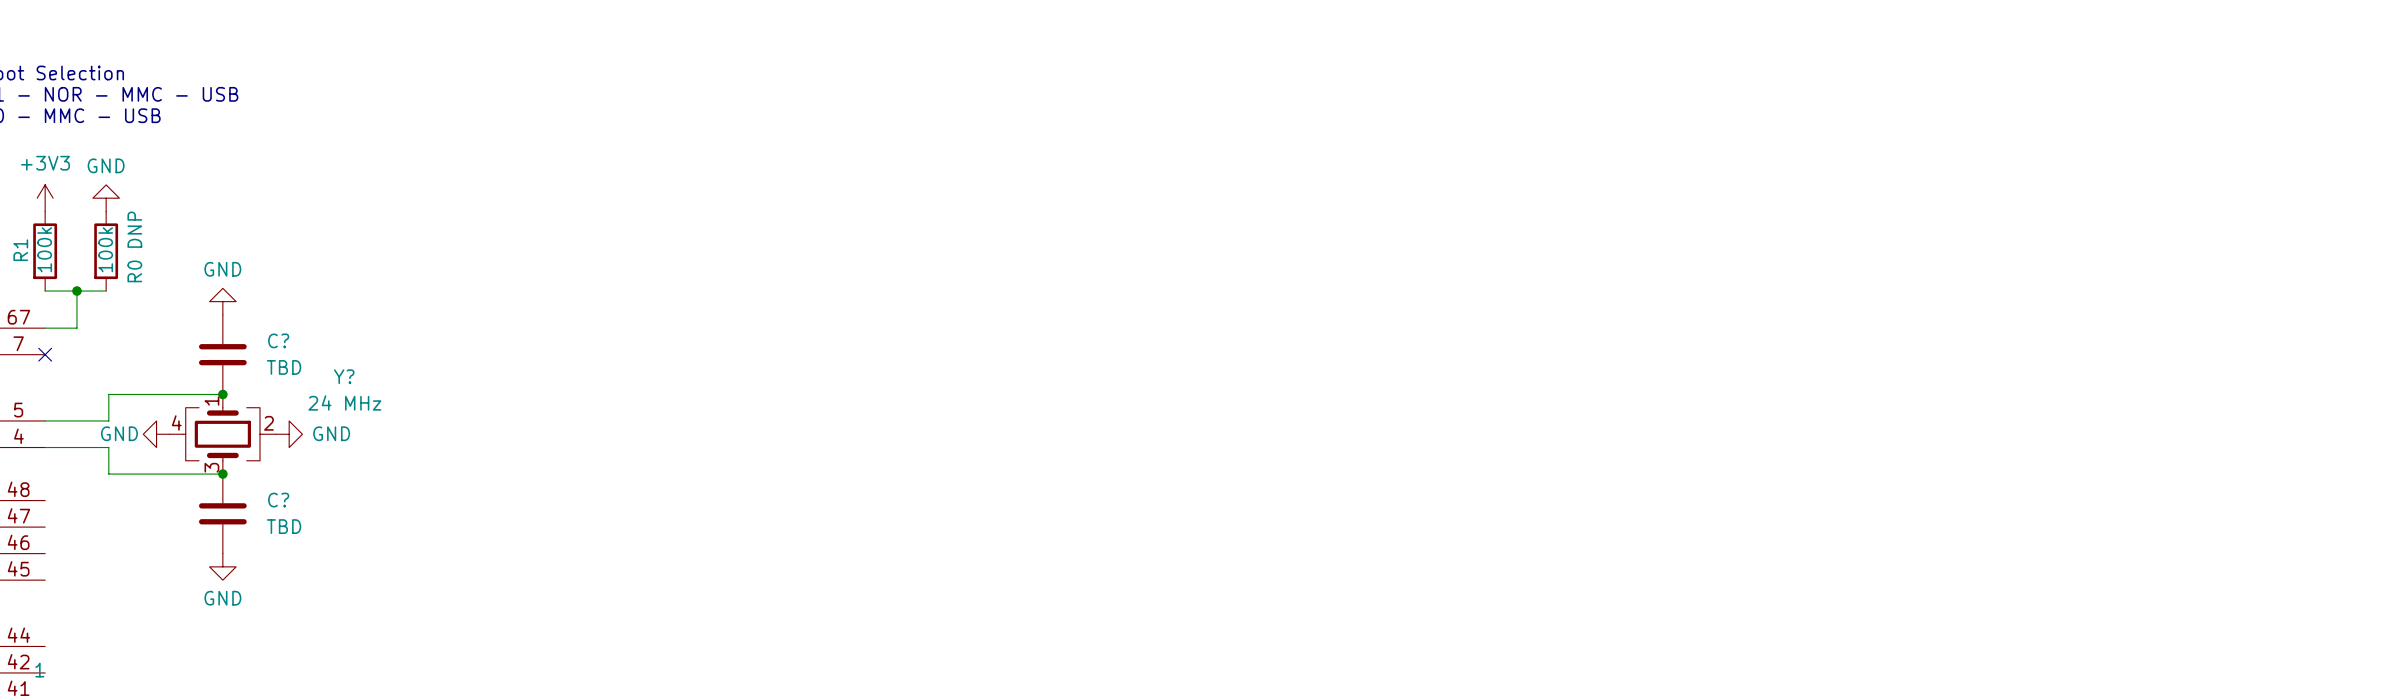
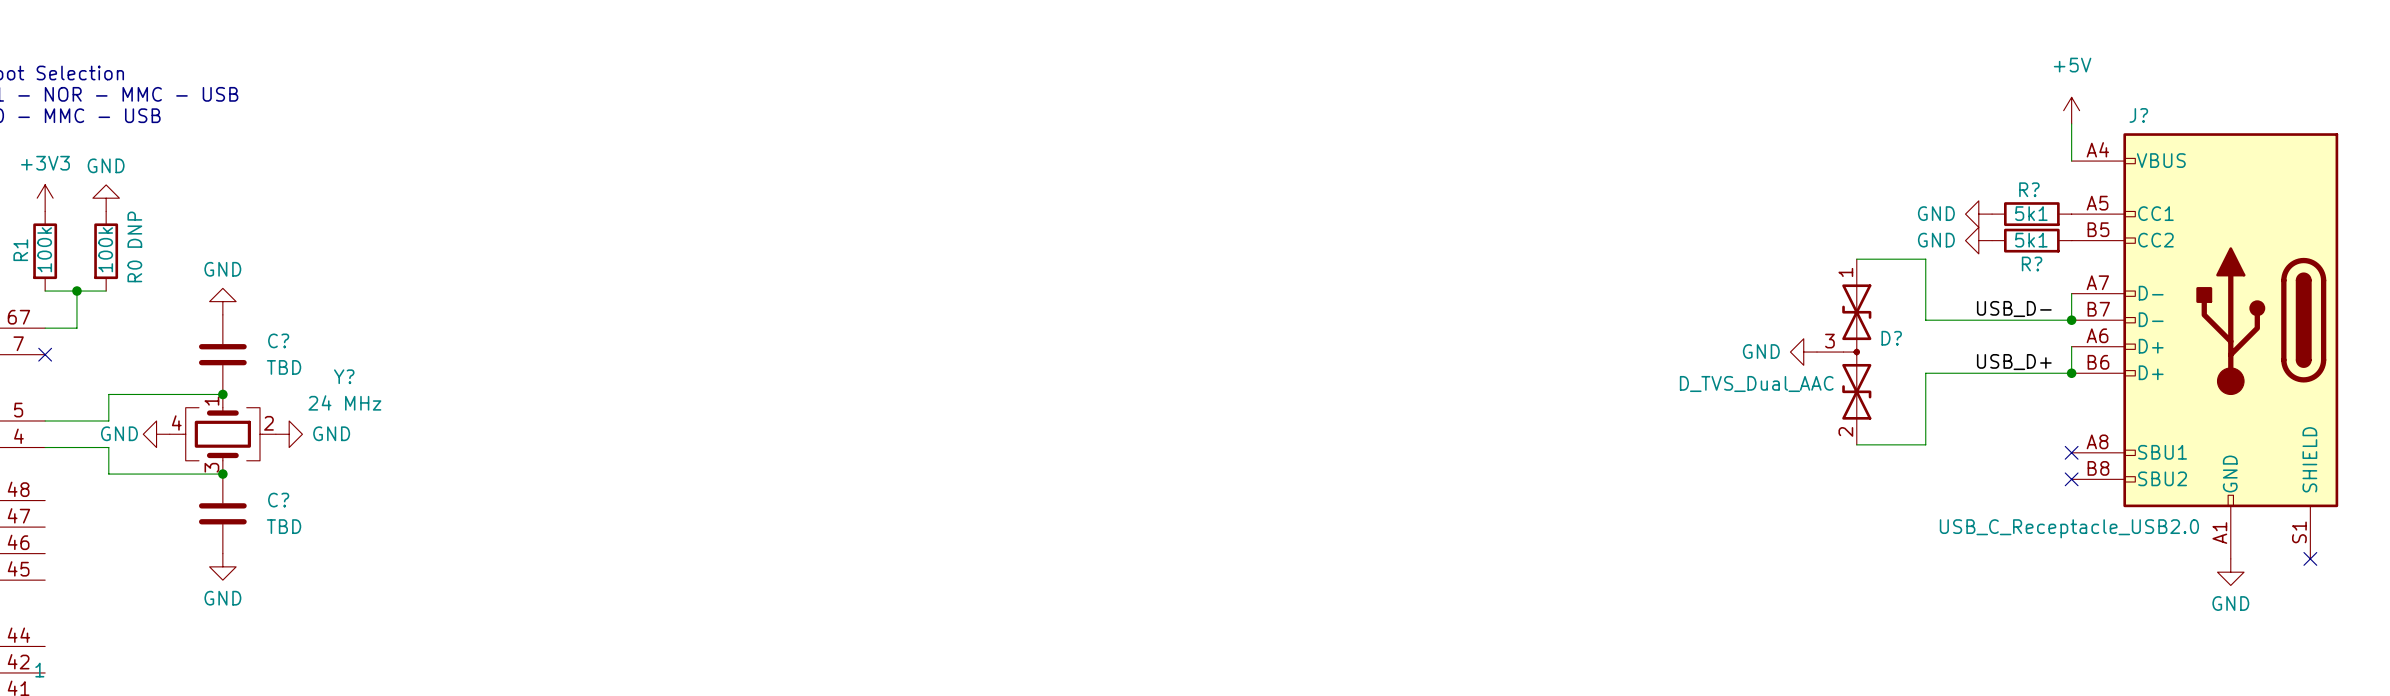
power symbol: none -> +5V (2071, 110)
wire: none -> (2071, 123) (2071, 161)
power symbol: none -> GND (1978, 214)
R?: none -> 5k1 (2031, 214)
power symbol: none -> GND (1978, 240)
R?: none -> 5k1 (2031, 240)
wire: none -> (1856, 259) (1925, 259) (1925, 320) (2071, 320) (2071, 293)
label: none -> USB_D- (2014, 308)
junction: none -> (2071, 320)
wire: none -> (2071, 346) (2071, 373) (1925, 373) (1925, 444) (1856, 444)
J?: none -> USB_C_Receptacle_USB2.0 (2204, 346)
power symbol: none -> GND (1803, 352)
D?: none -> D_TVS_Dual_AAC (1844, 352)
label: none -> USB_D+ (2014, 362)
junction: none -> (2071, 373)
no-connect mark: none -> (2071, 452)
no-connect mark: none -> (2071, 479)
no-connect mark: none -> (2310, 558)
power symbol: none -> GND (2230, 572)

